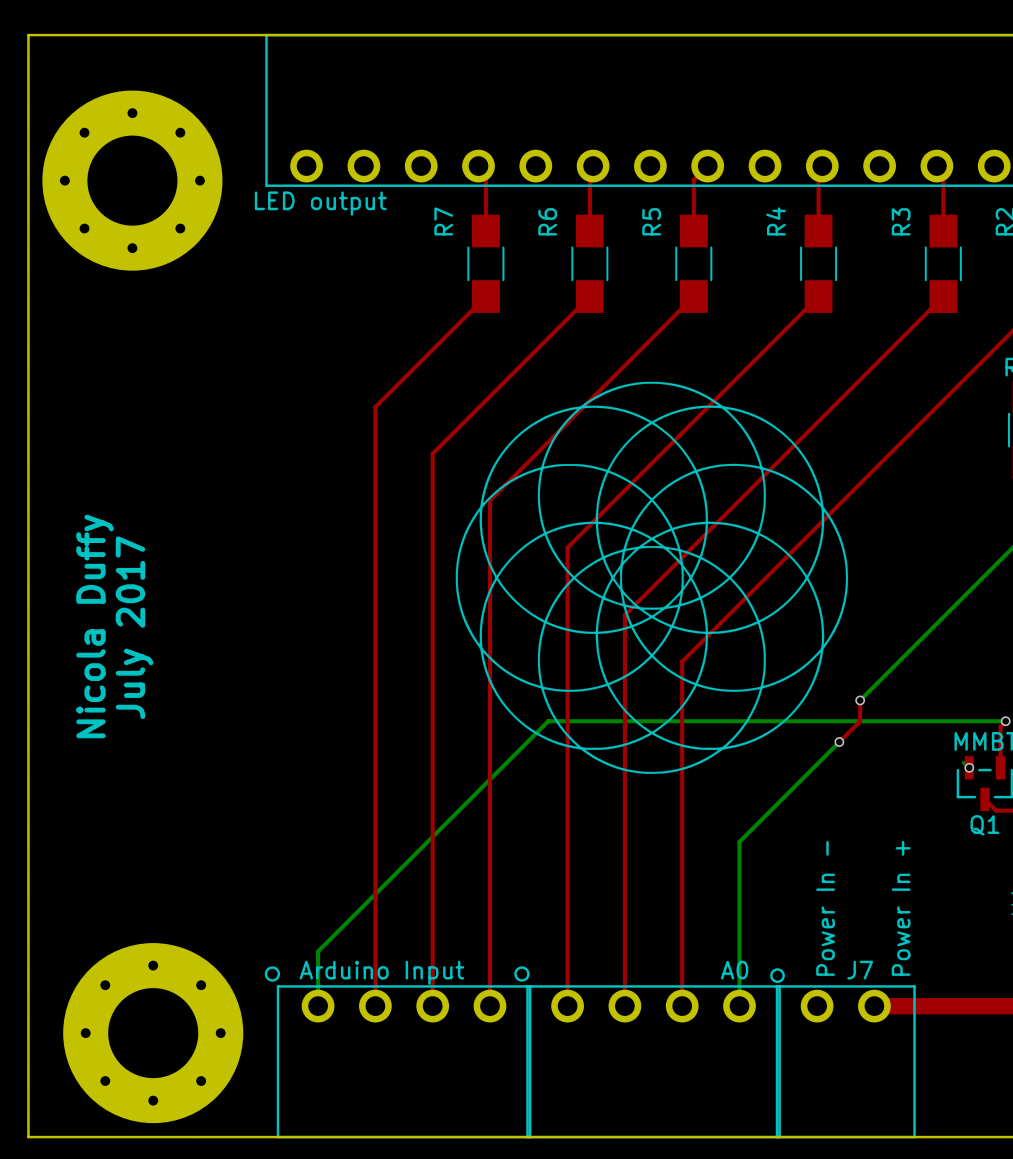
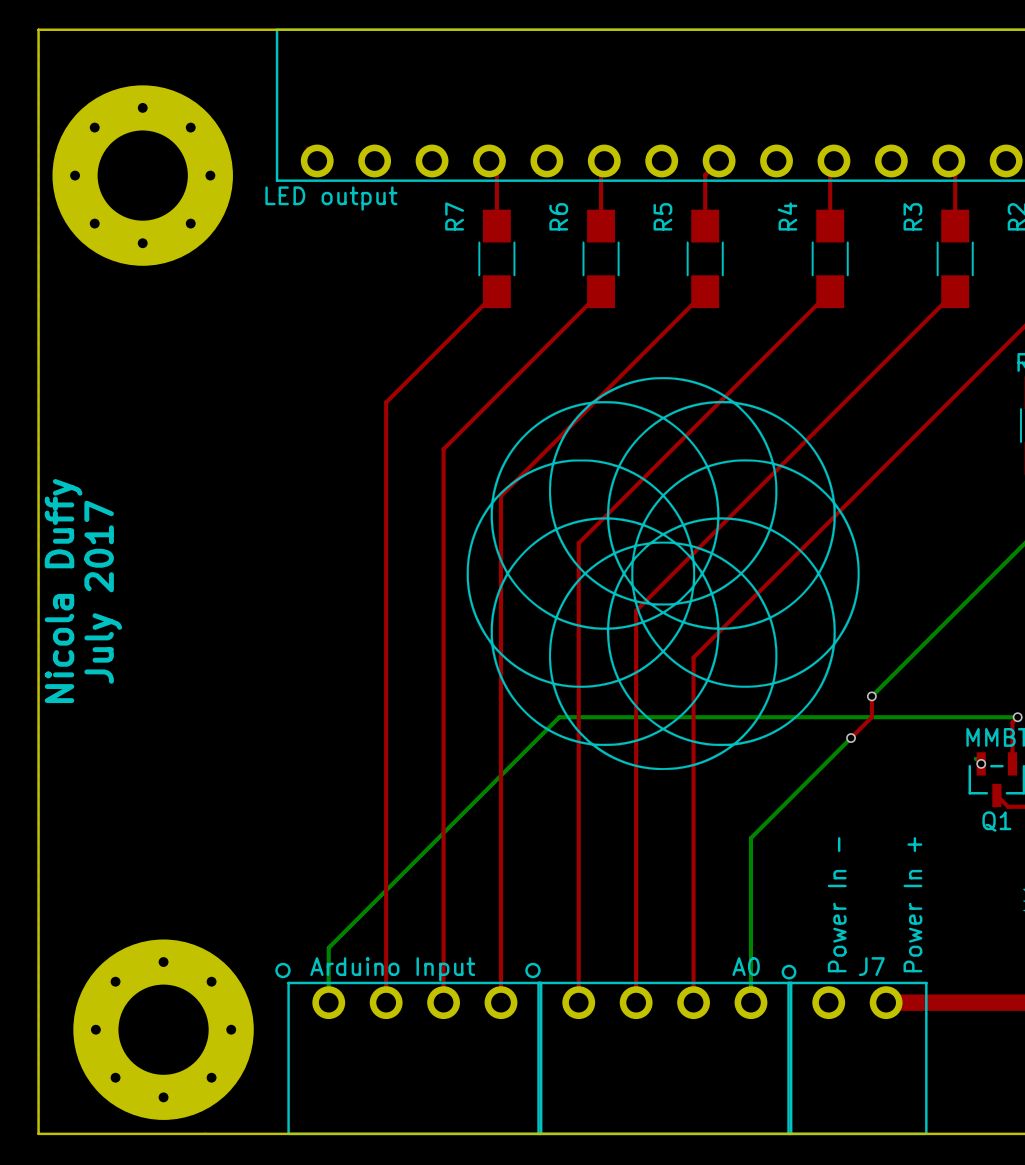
text position: Nicola Duffy (95, 626) -> Nicola Duffy (63, 591)
text position: July 2017 (134, 627) -> July 2017 (103, 592)

